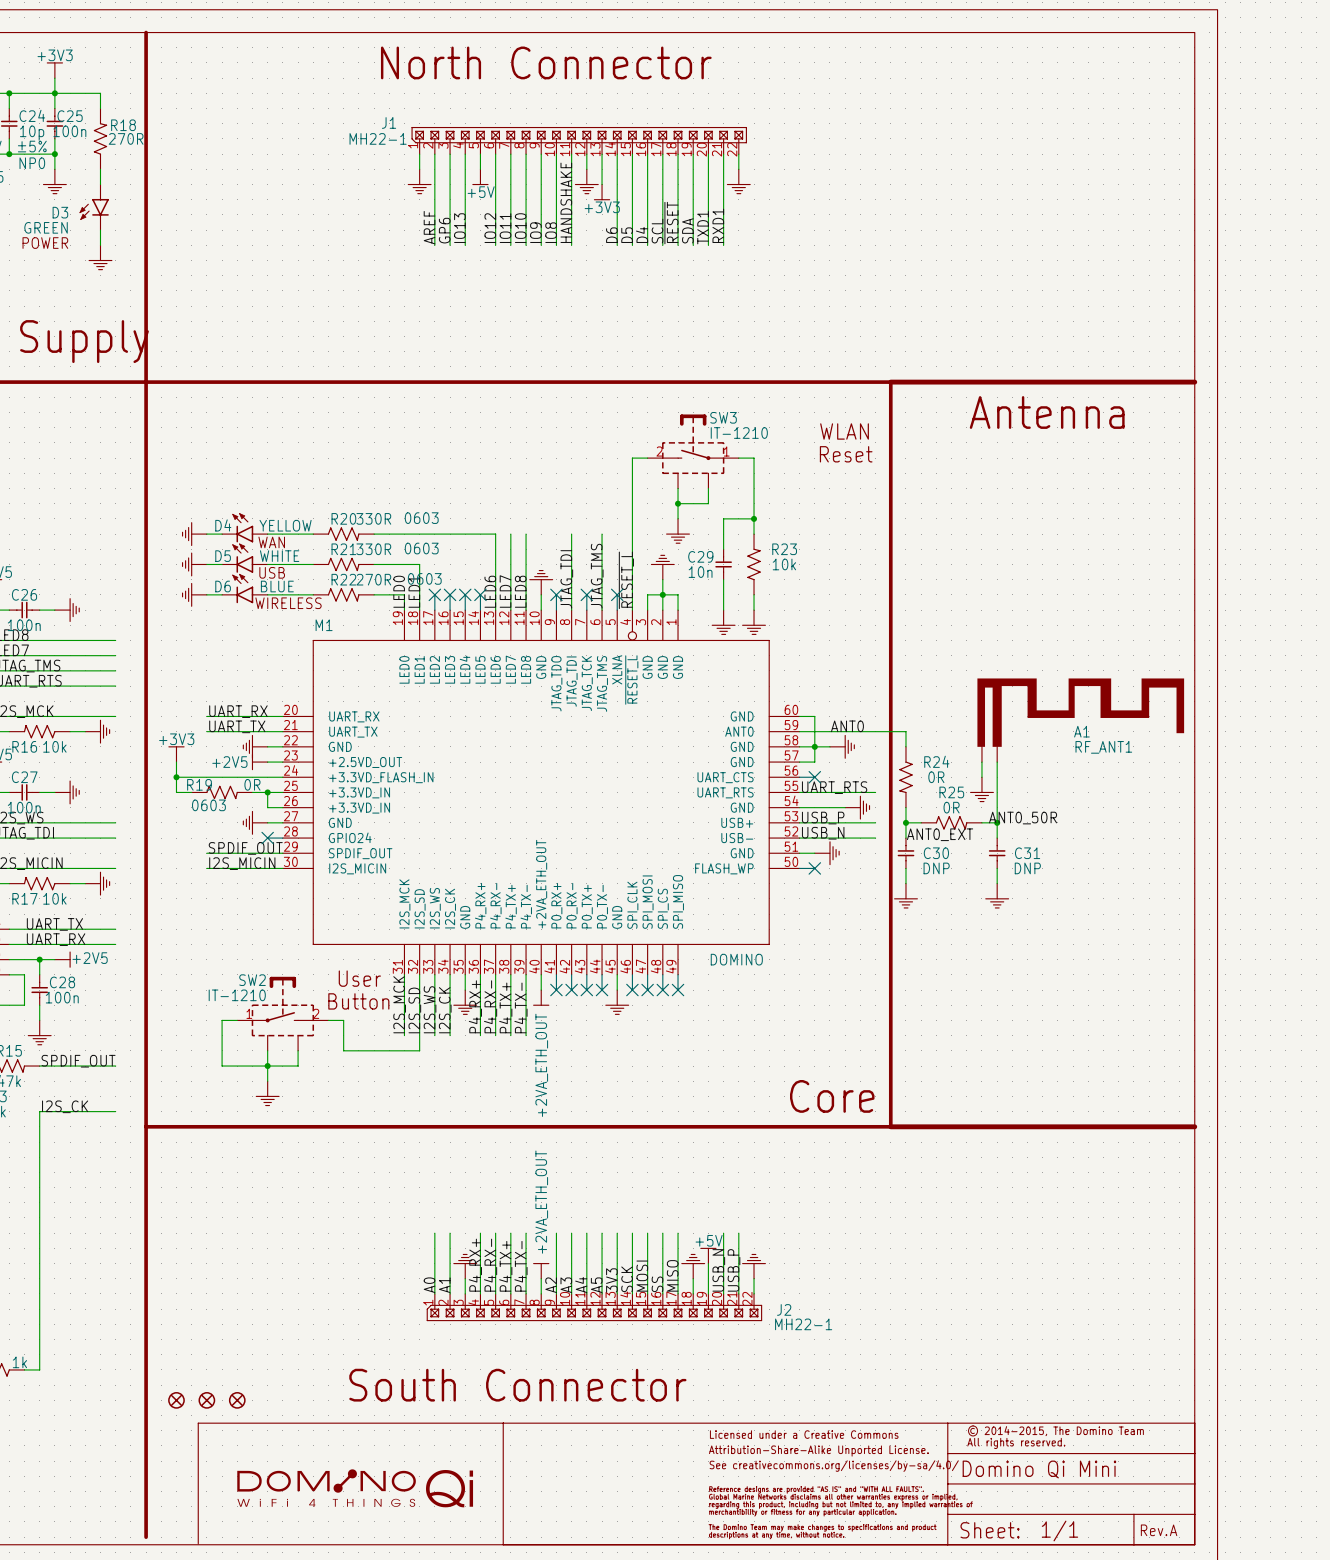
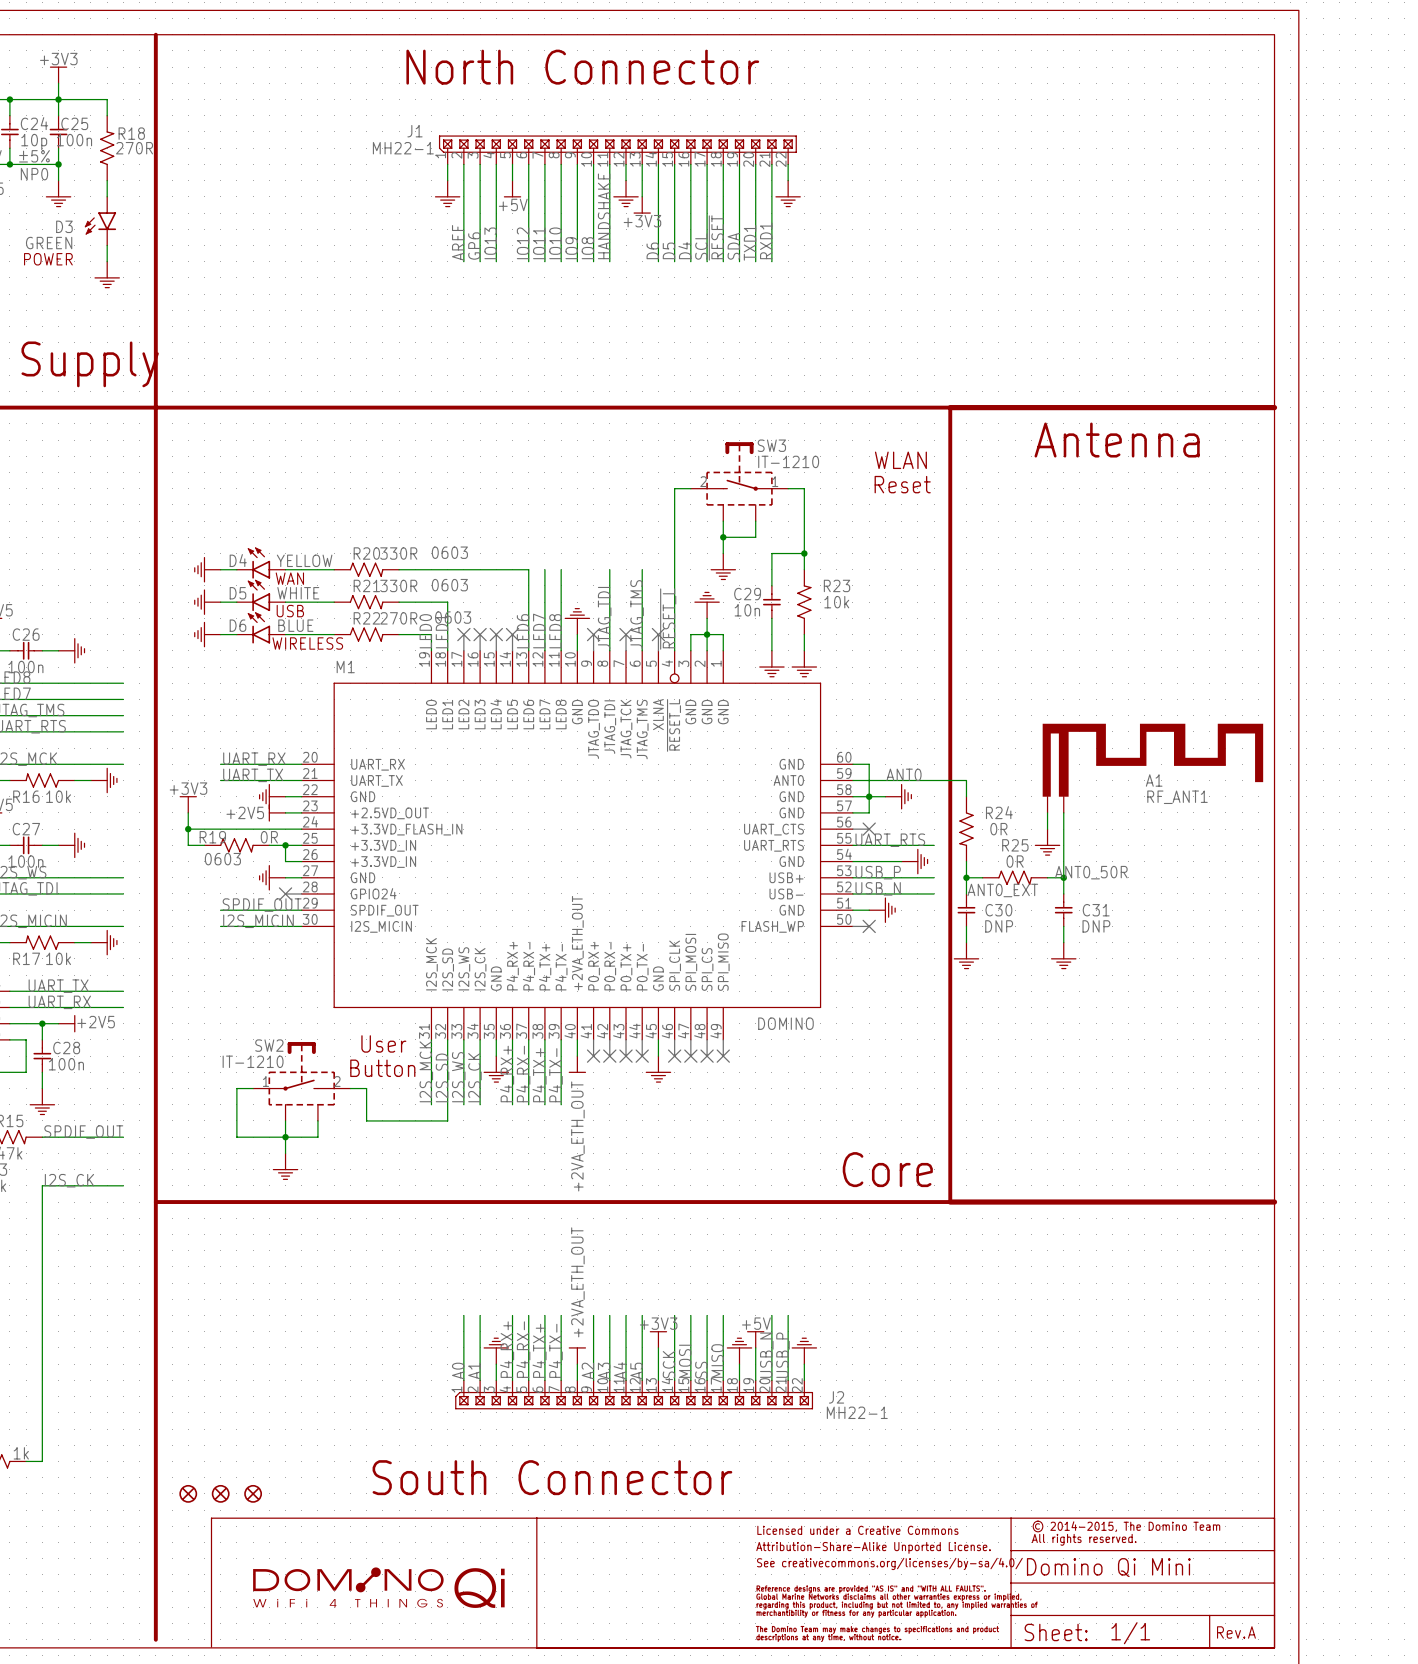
power symbol: none -> +3V3 (658, 1339)
label: 3V3 (611, 1280) -> none

